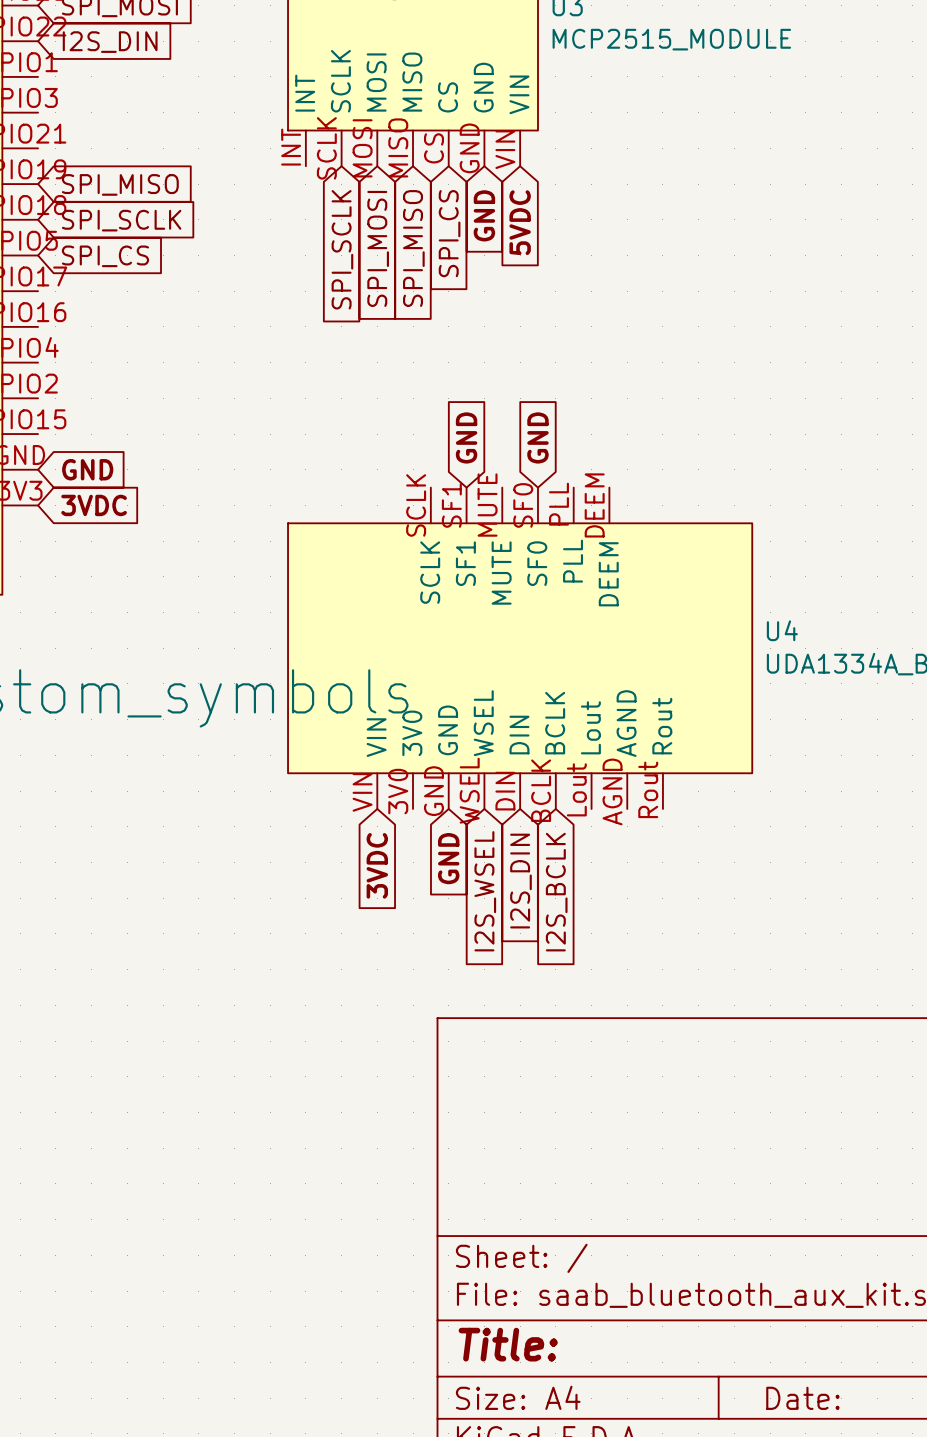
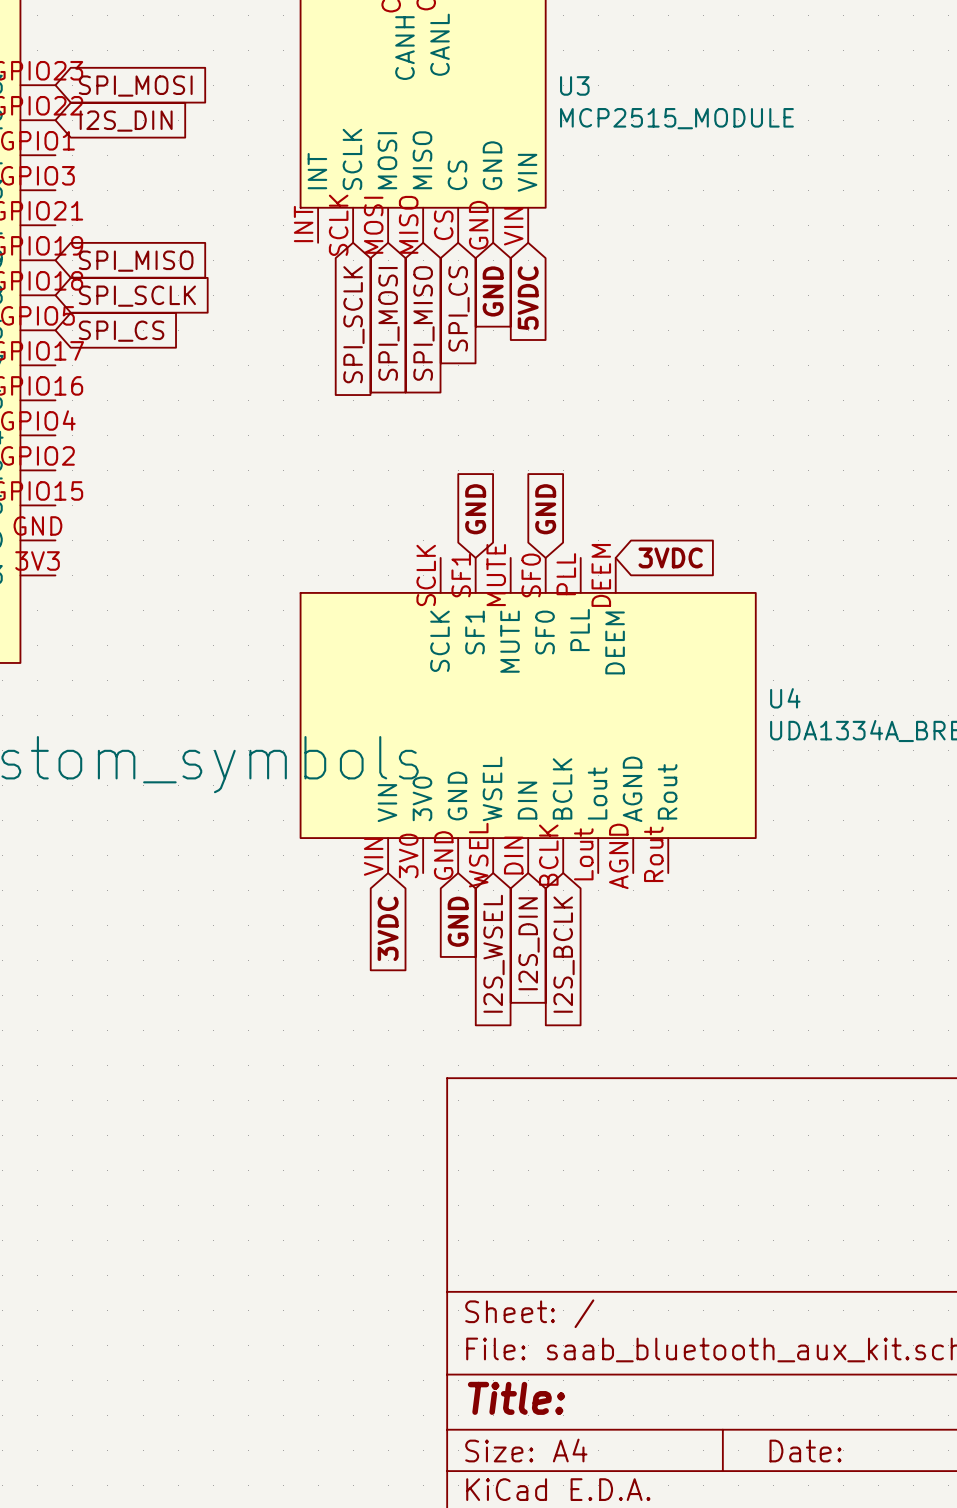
global label: GND (87, 469) -> none
global label: none -> 3VDC (670, 557)
global label: 3VDC (94, 505) -> none

